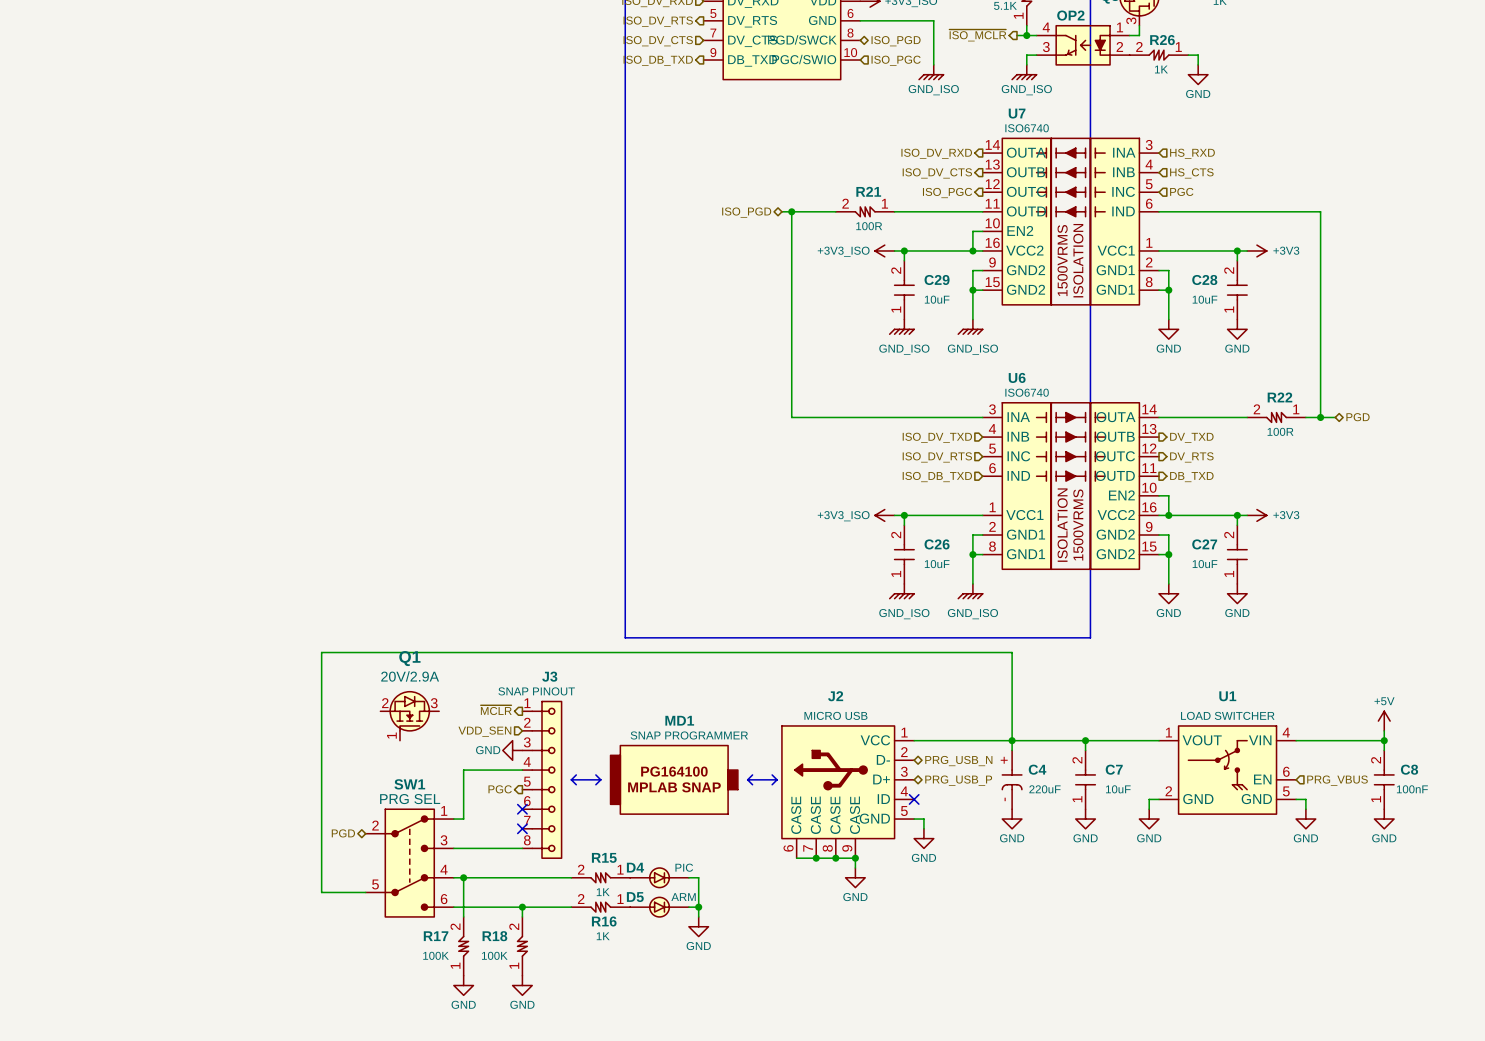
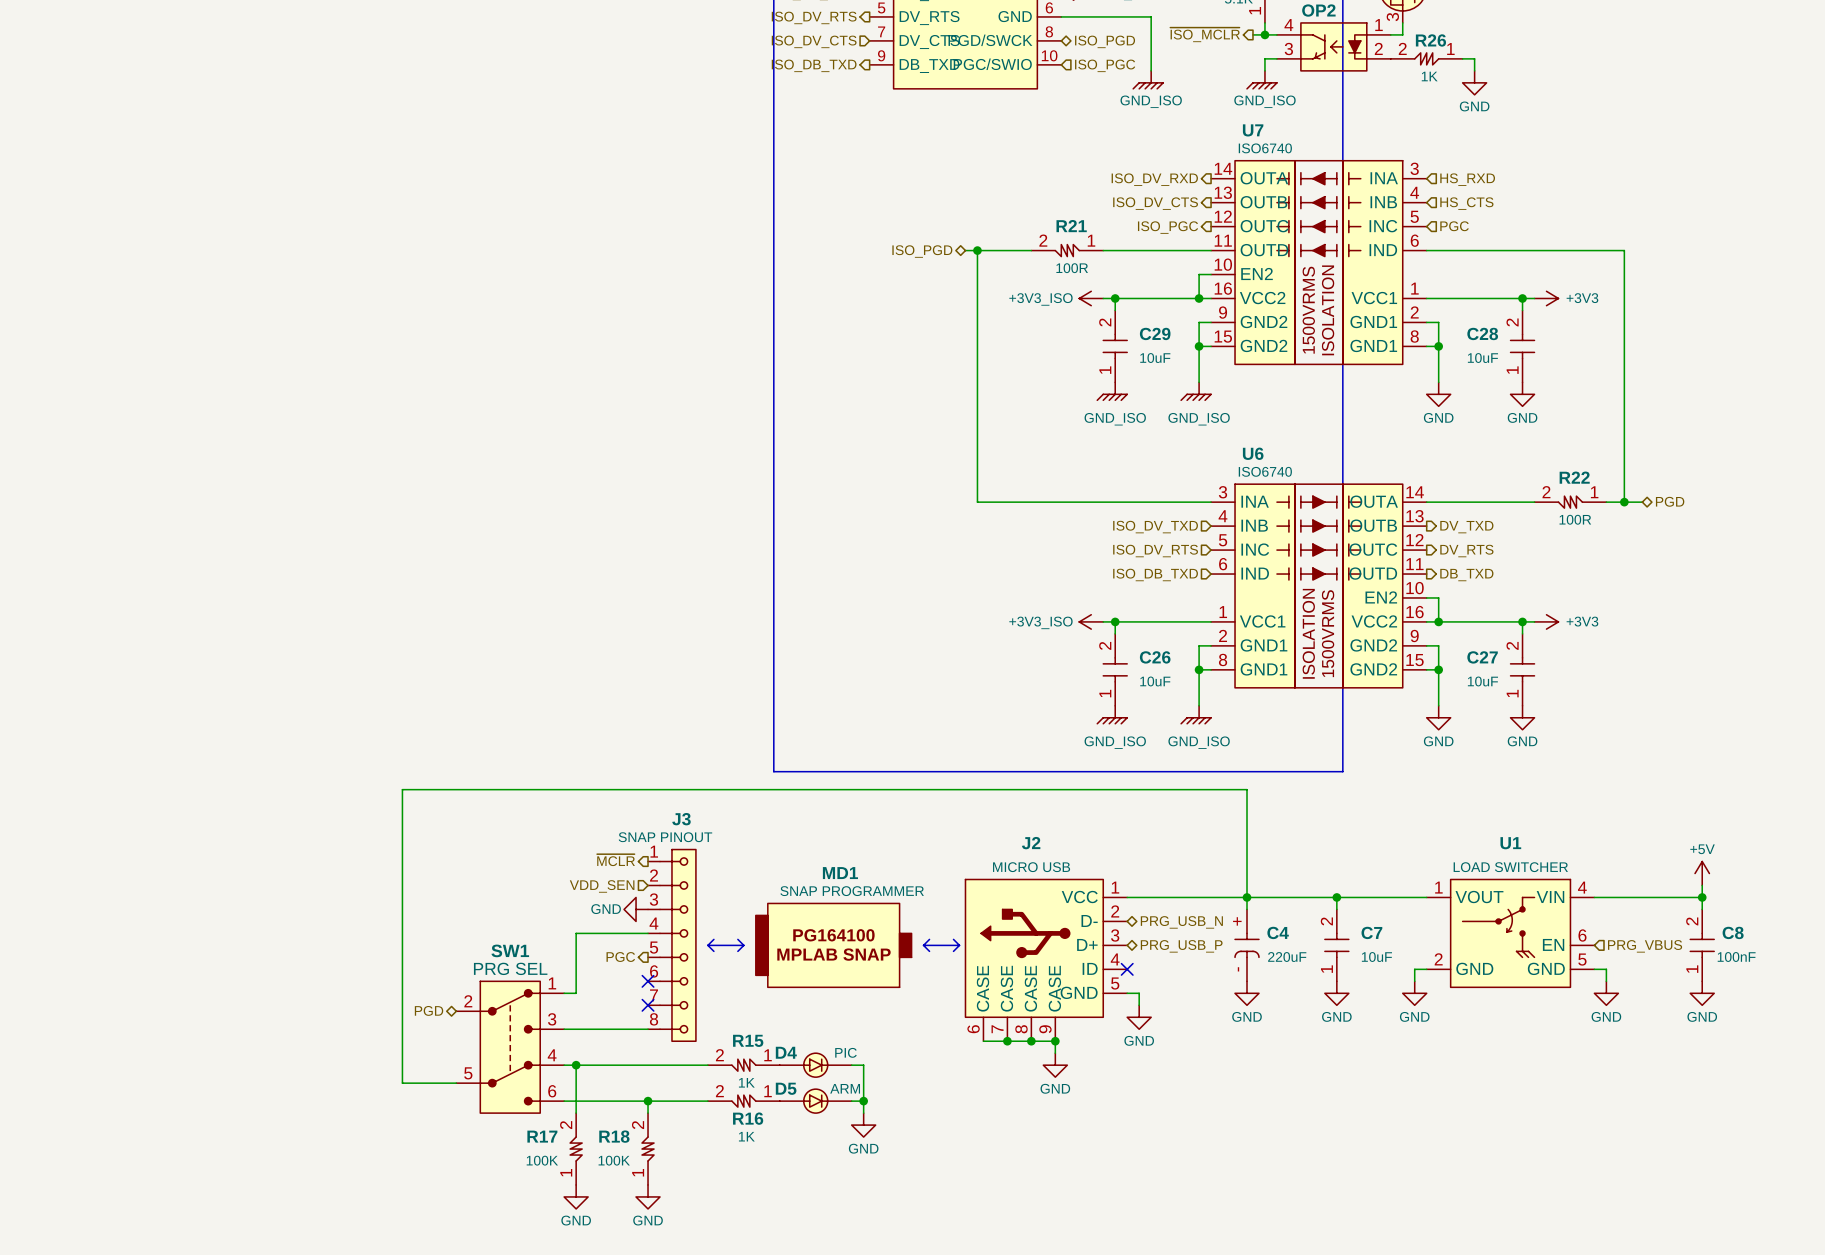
Q1: 20V/2.9A (409, 716) -> none

